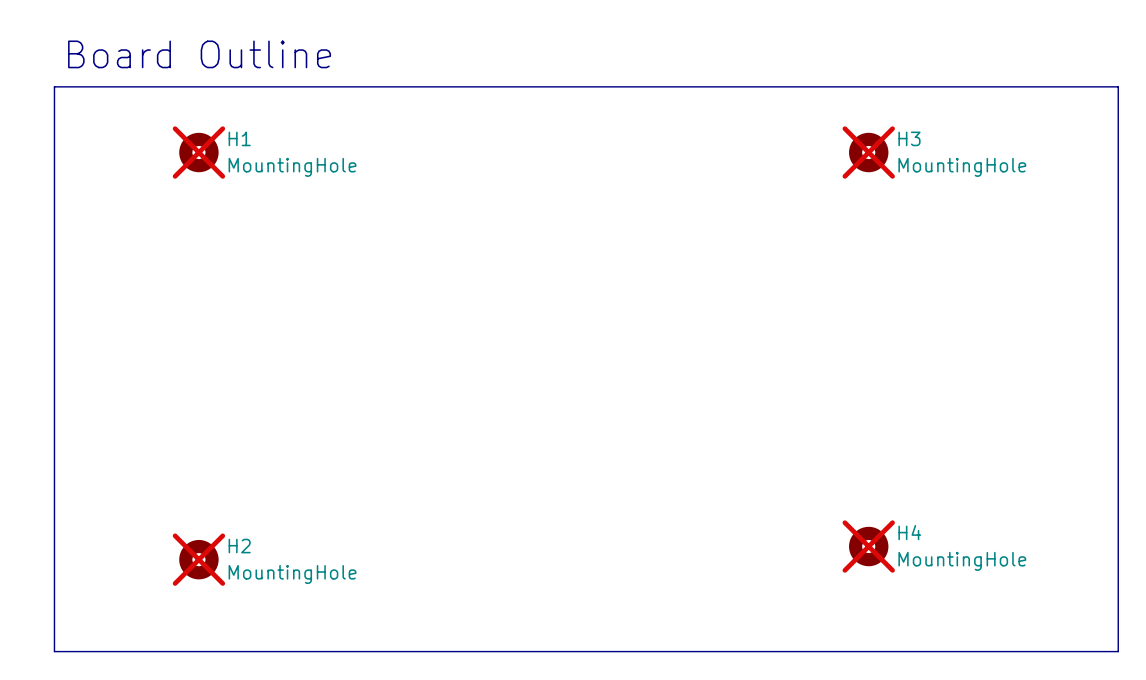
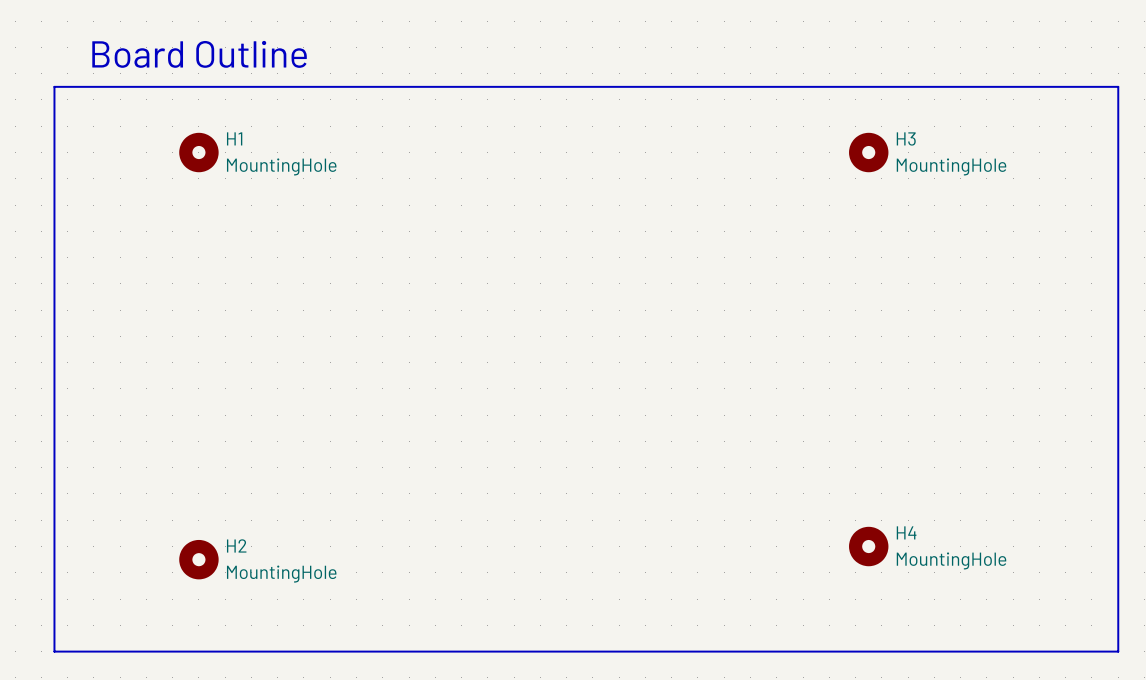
H1 do-not-place cross: (198, 152) -> none
H3 do-not-place cross: (868, 152) -> none
H4 do-not-place cross: (868, 546) -> none
H2 do-not-place cross: (198, 559) -> none

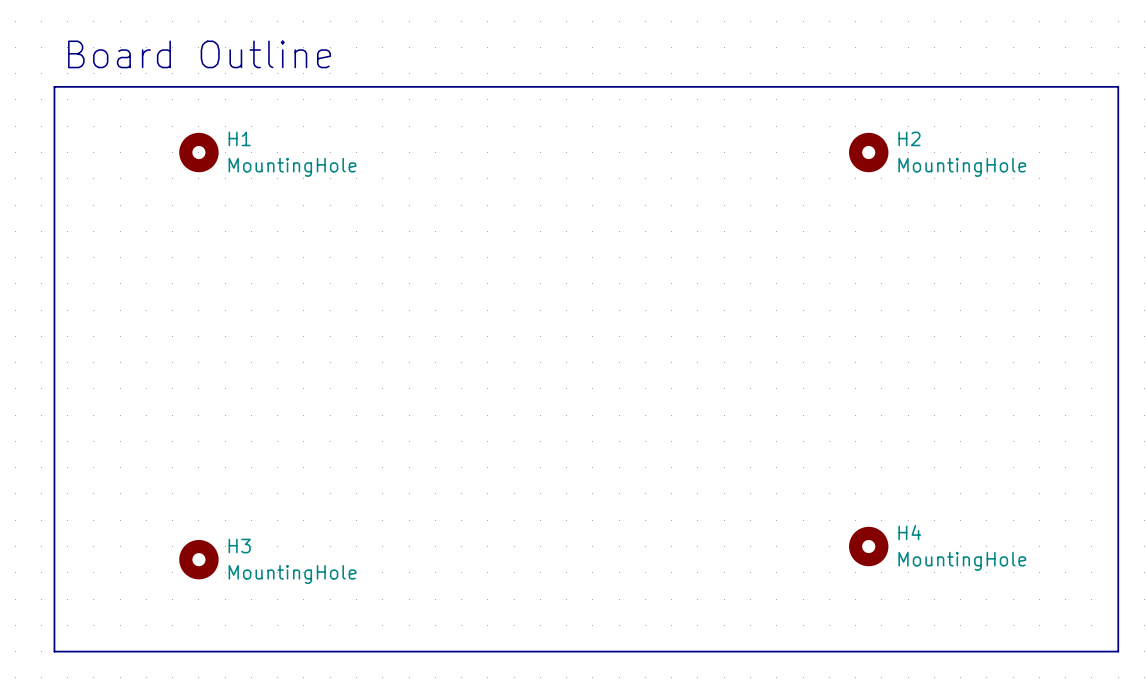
H3 name: H3 (906, 138) -> H2 (909, 138)
H2 name: H2 (236, 545) -> H3 (239, 546)

